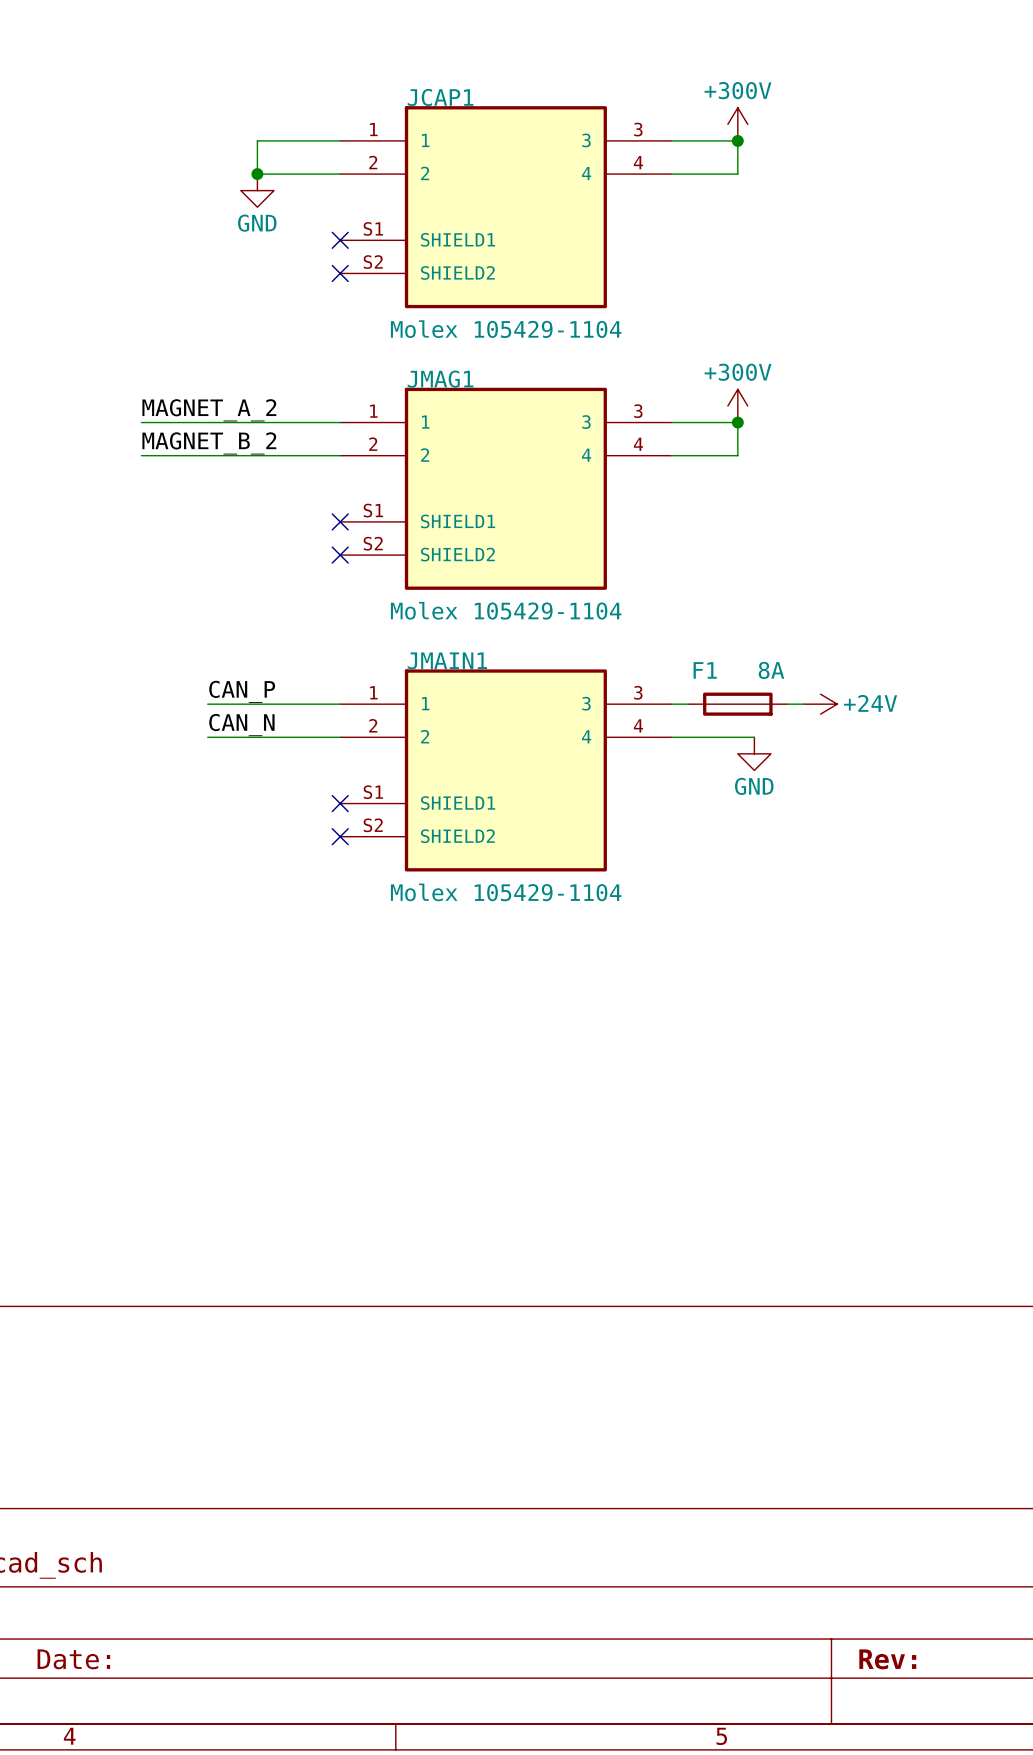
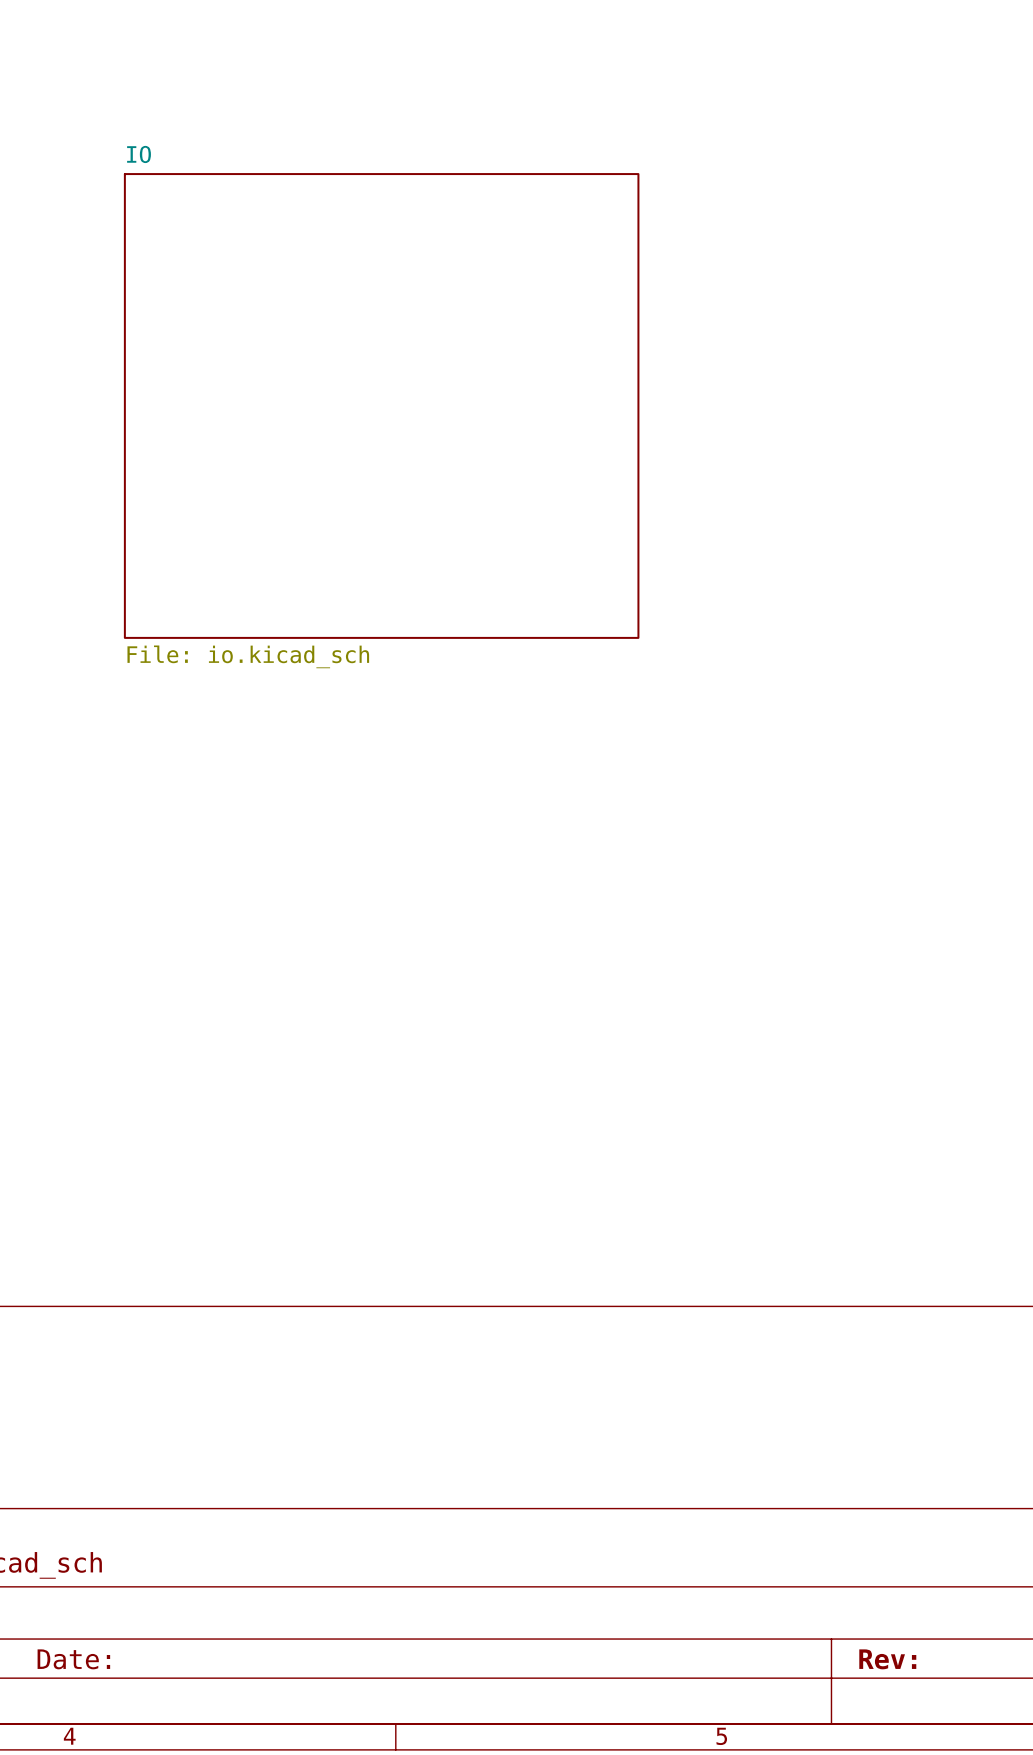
power symbol: +300V (737, 124) -> none
wire: (340, 140) (257, 140) (257, 174) (340, 174) -> none
wire: (671, 140) (737, 140) (737, 174) (671, 174) -> none
junction: (737, 140) -> none
junction: (257, 174) -> none
power symbol: GND (257, 190) -> none
JCAP1: Molex 105429-1104 (505, 207) -> none
no-connect mark: (340, 240) -> none
no-connect mark: (340, 273) -> none
sheet IO: none -> File: io.kicad_sch (381, 405)
power symbol: +300V (737, 405) -> none
label: MAGNET_A_2 (209, 410) -> none
wire: (141, 422) (340, 422) -> none
wire: (671, 422) (737, 422) (737, 455) (671, 455) -> none
junction: (737, 422) -> none
label: MAGNET_B_2 (209, 443) -> none
wire: (141, 455) (340, 455) -> none
JMAG1: Molex 105429-1104 (505, 488) -> none
no-connect mark: (340, 521) -> none
no-connect mark: (340, 555) -> none
label: CAN_P (242, 691) -> none
wire: (207, 704) (340, 704) -> none
wire: (671, 704) (688, 704) -> none
F1: 8A (737, 704) -> none
wire: (787, 704) (804, 704) -> none
power symbol: +24V (820, 704) -> none
label: CAN_N (241, 725) -> none
wire: (207, 737) (340, 737) -> none
wire: (671, 737) (754, 737) -> none
power symbol: GND (754, 753) -> none
JMAIN1: Molex 105429-1104 (505, 770) -> none
no-connect mark: (340, 803) -> none
no-connect mark: (340, 836) -> none

